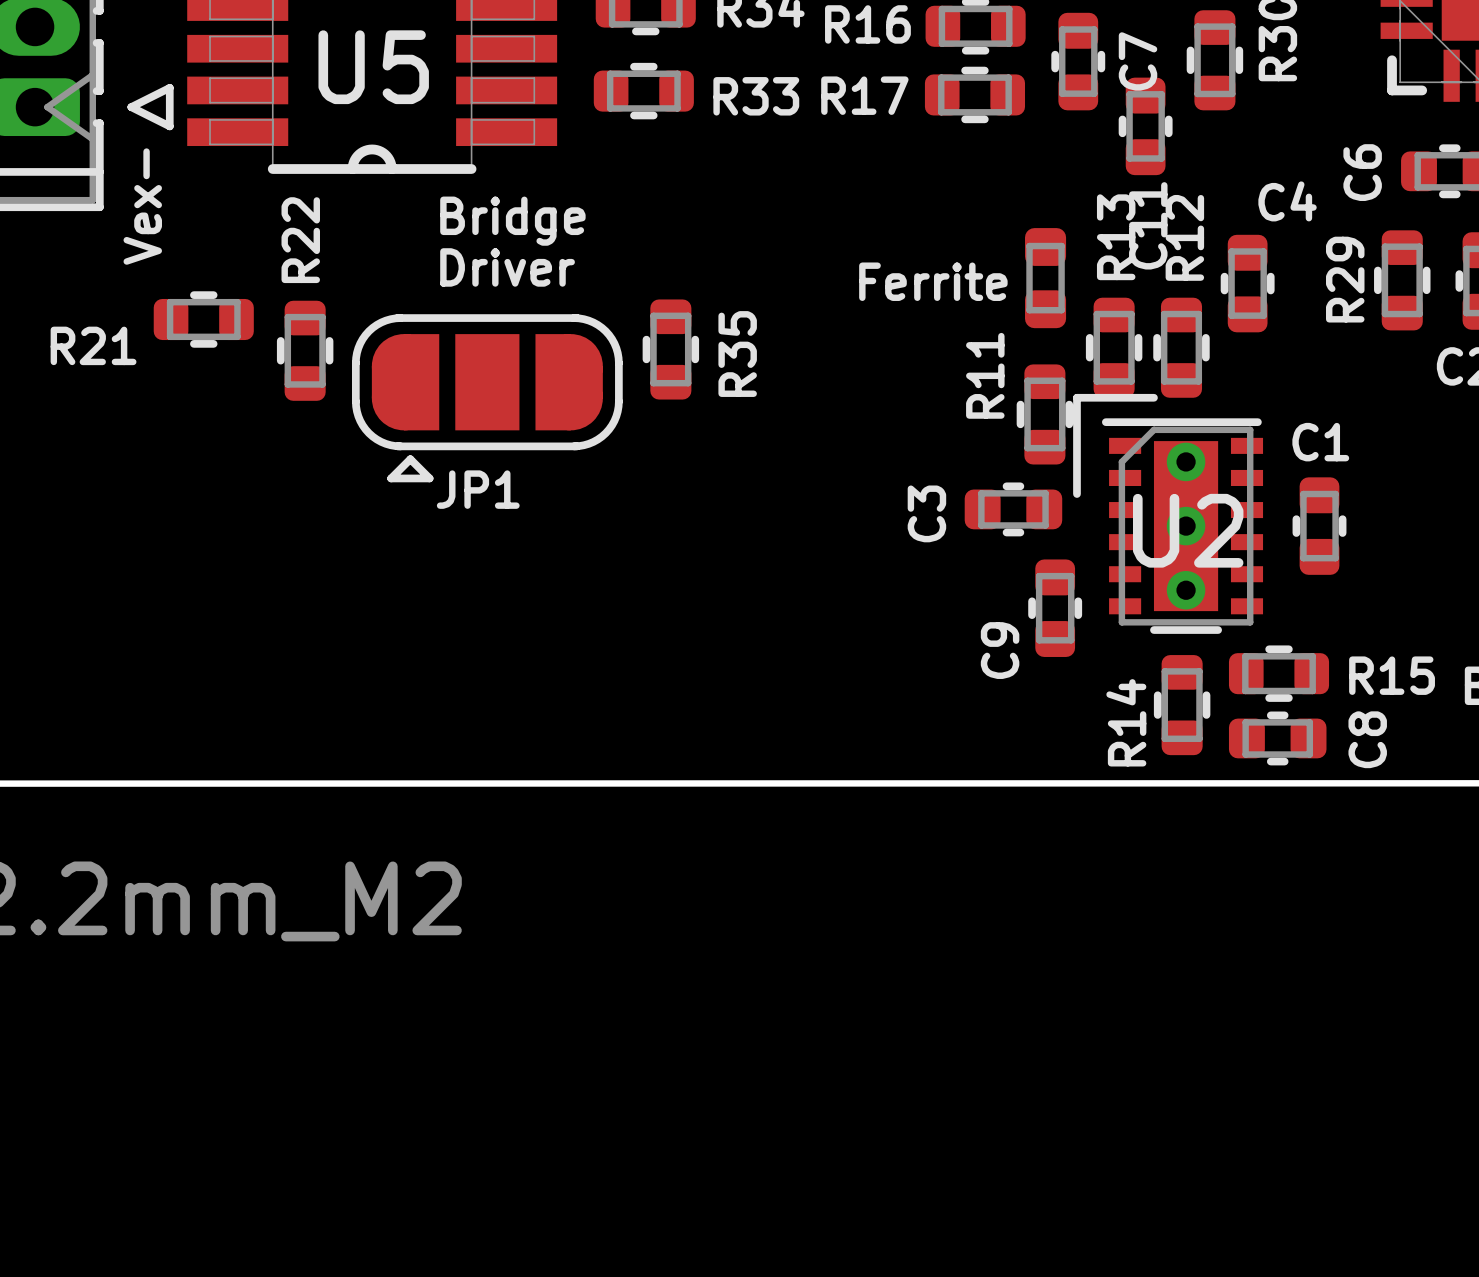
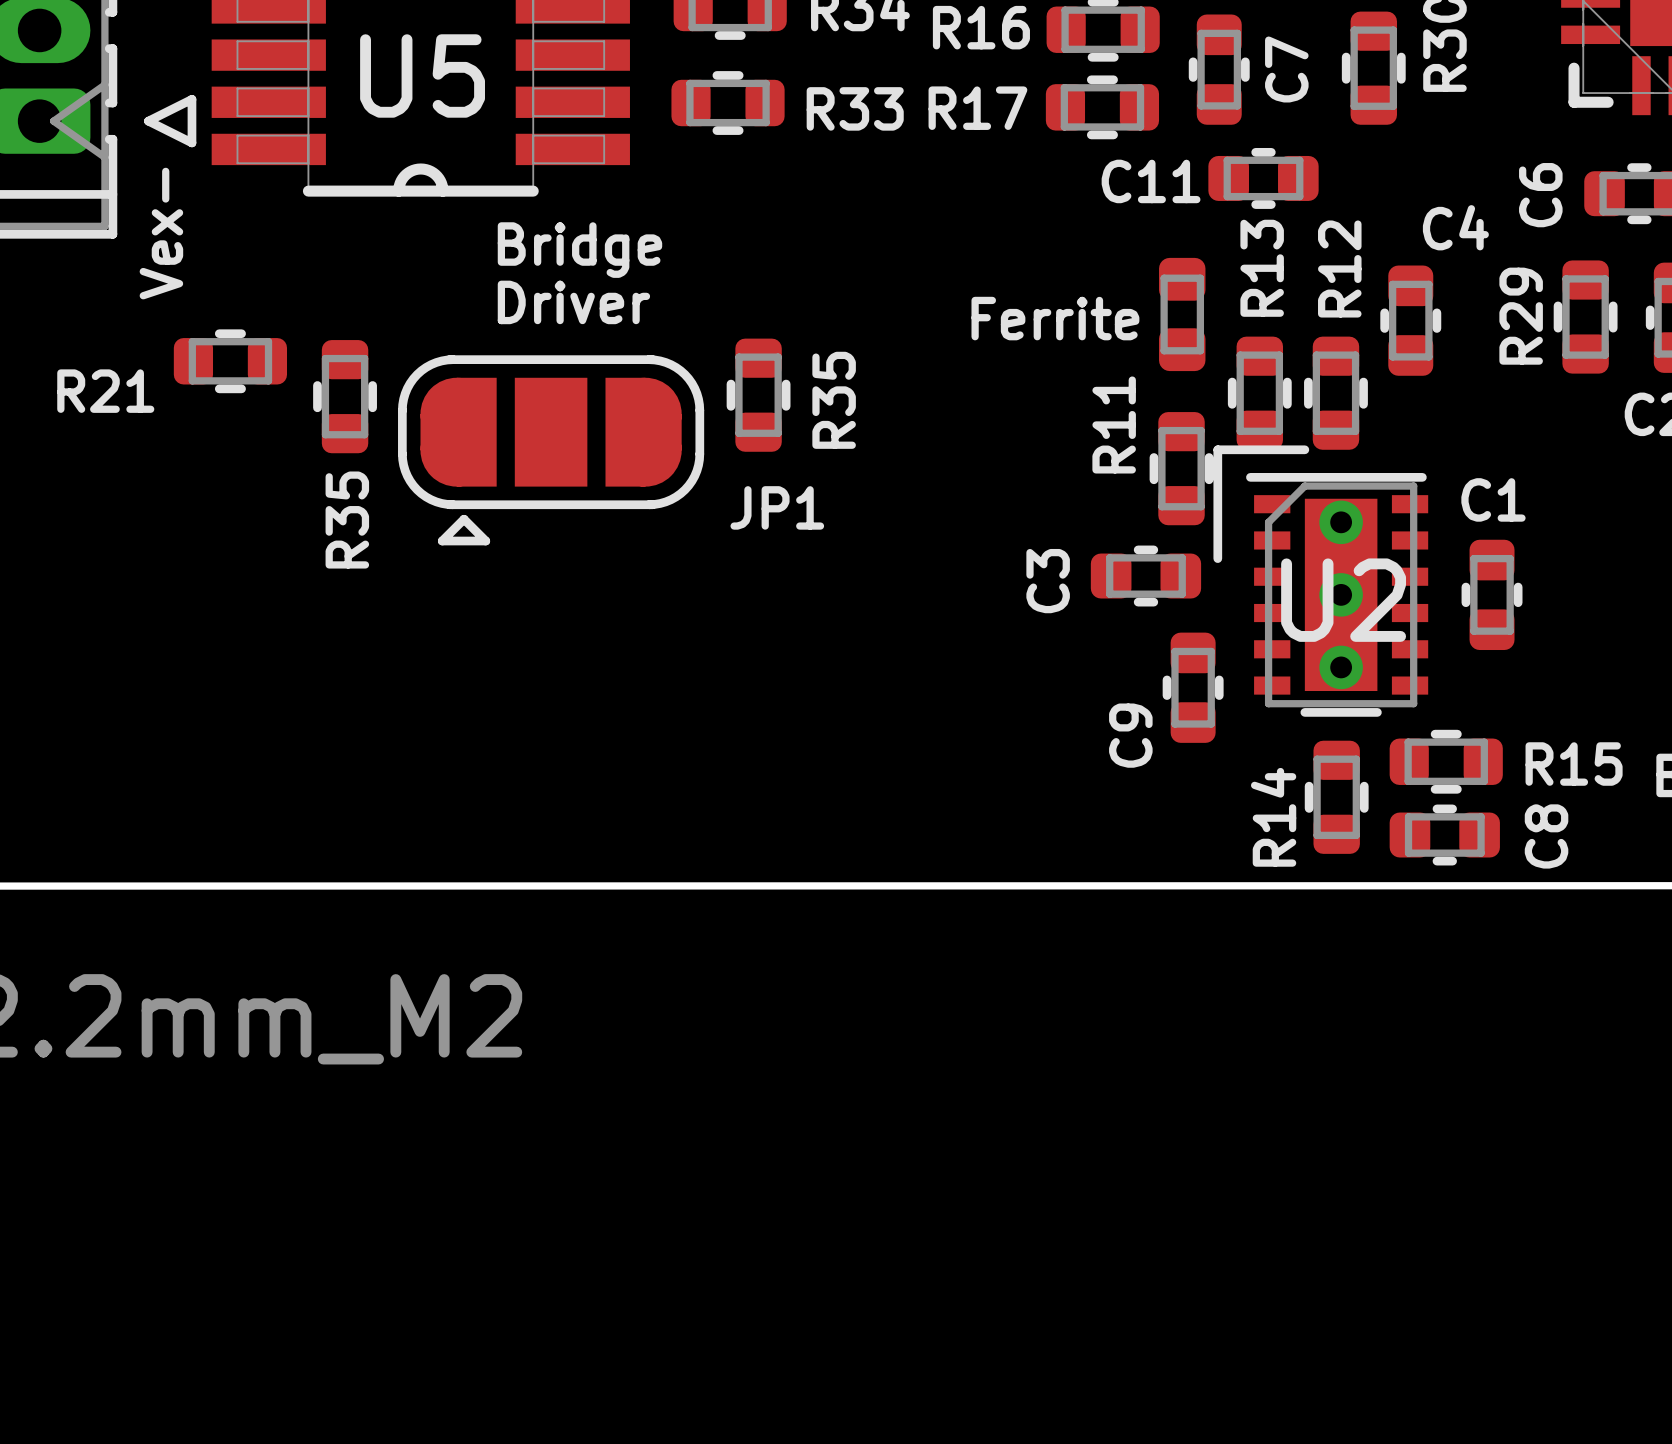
C11 rotation: 0° (1145, 126) -> 90° clockwise (1263, 178)
R22 name: R22 (300, 240) -> R35 (347, 520)
JP1 name position: JP1 (478, 489) -> JP1 (777, 507)

